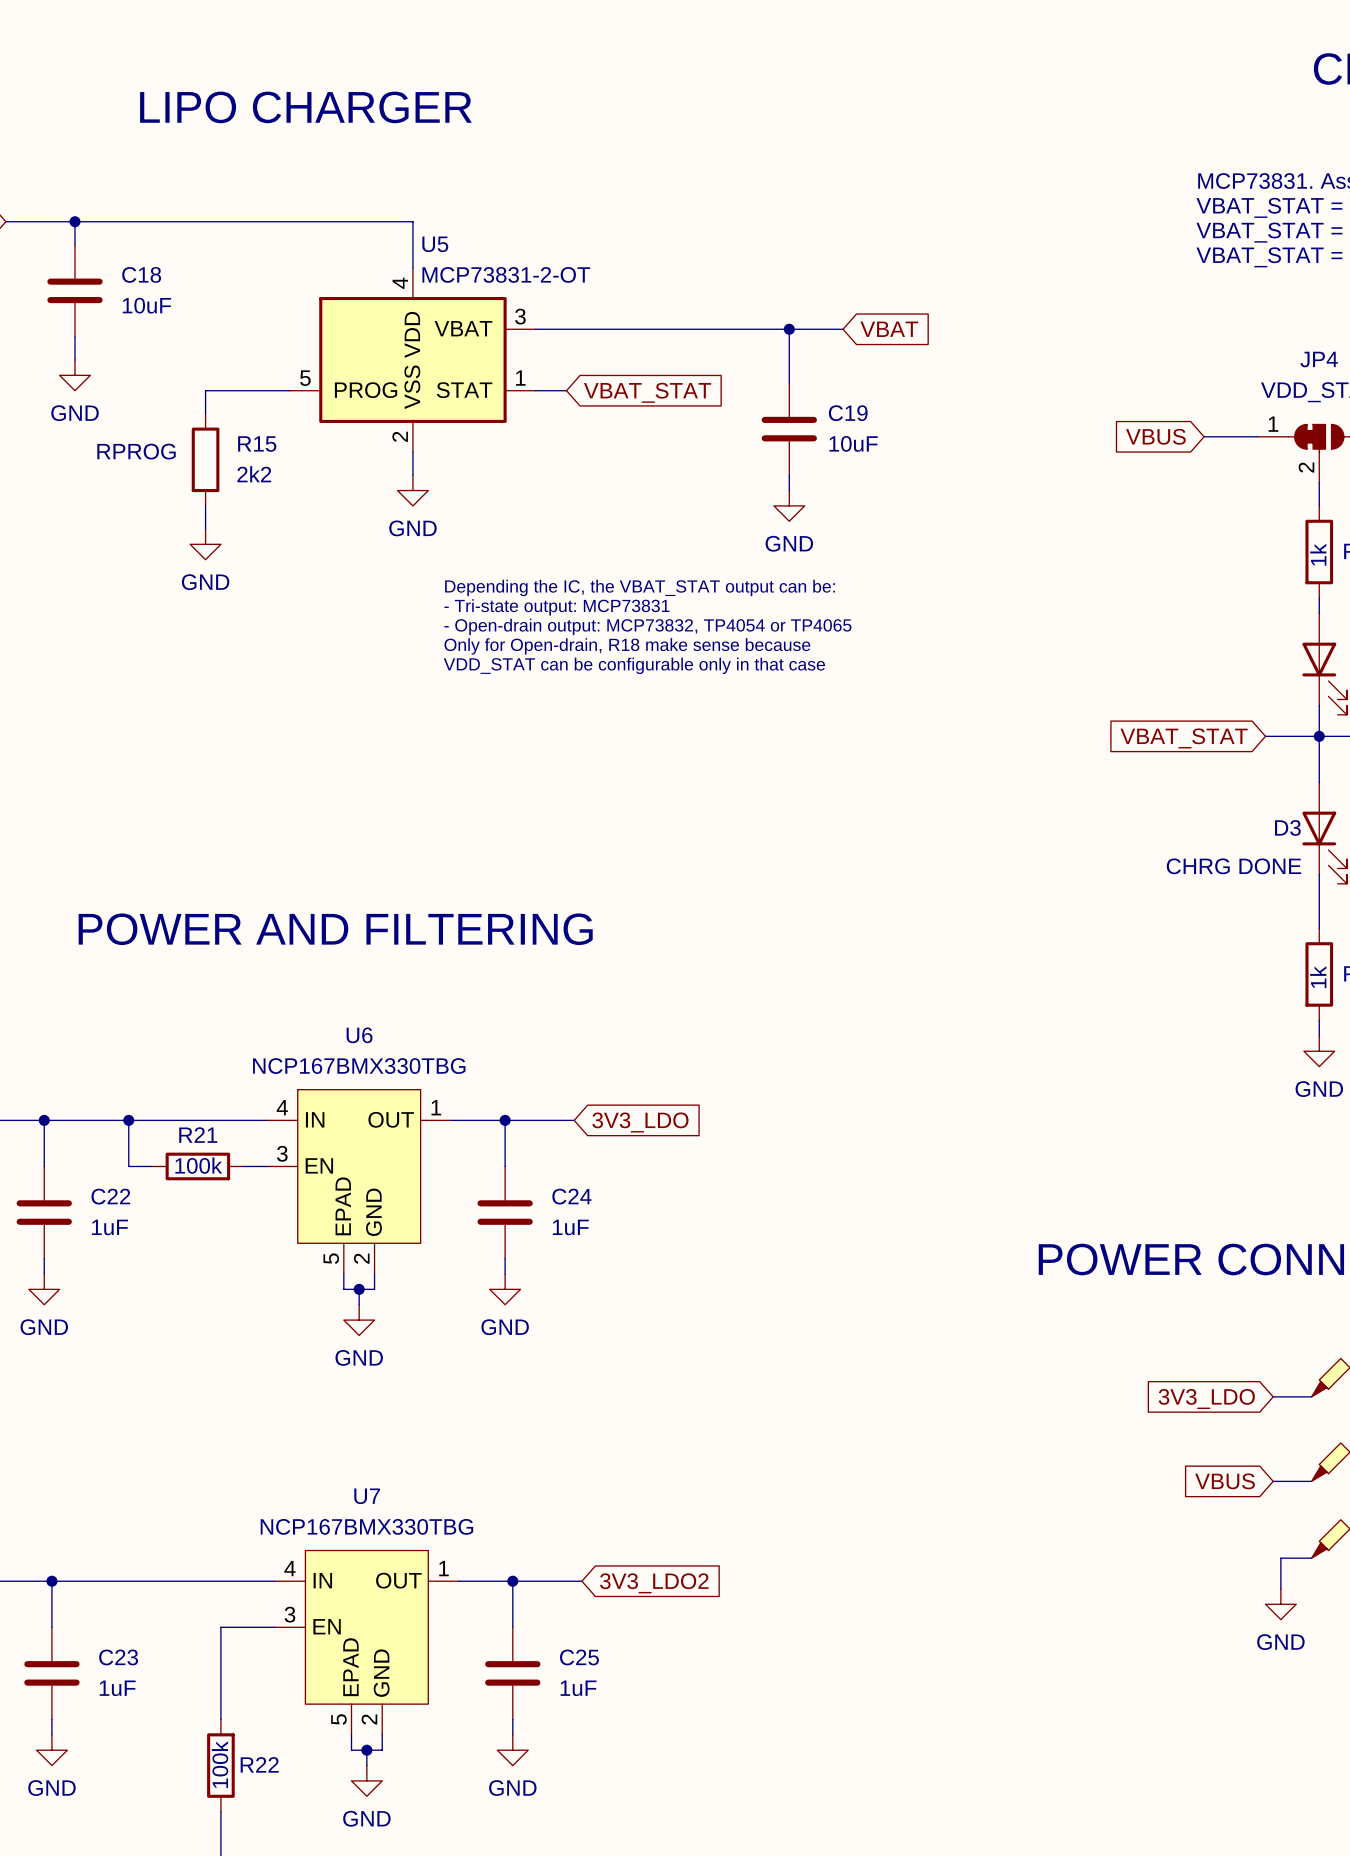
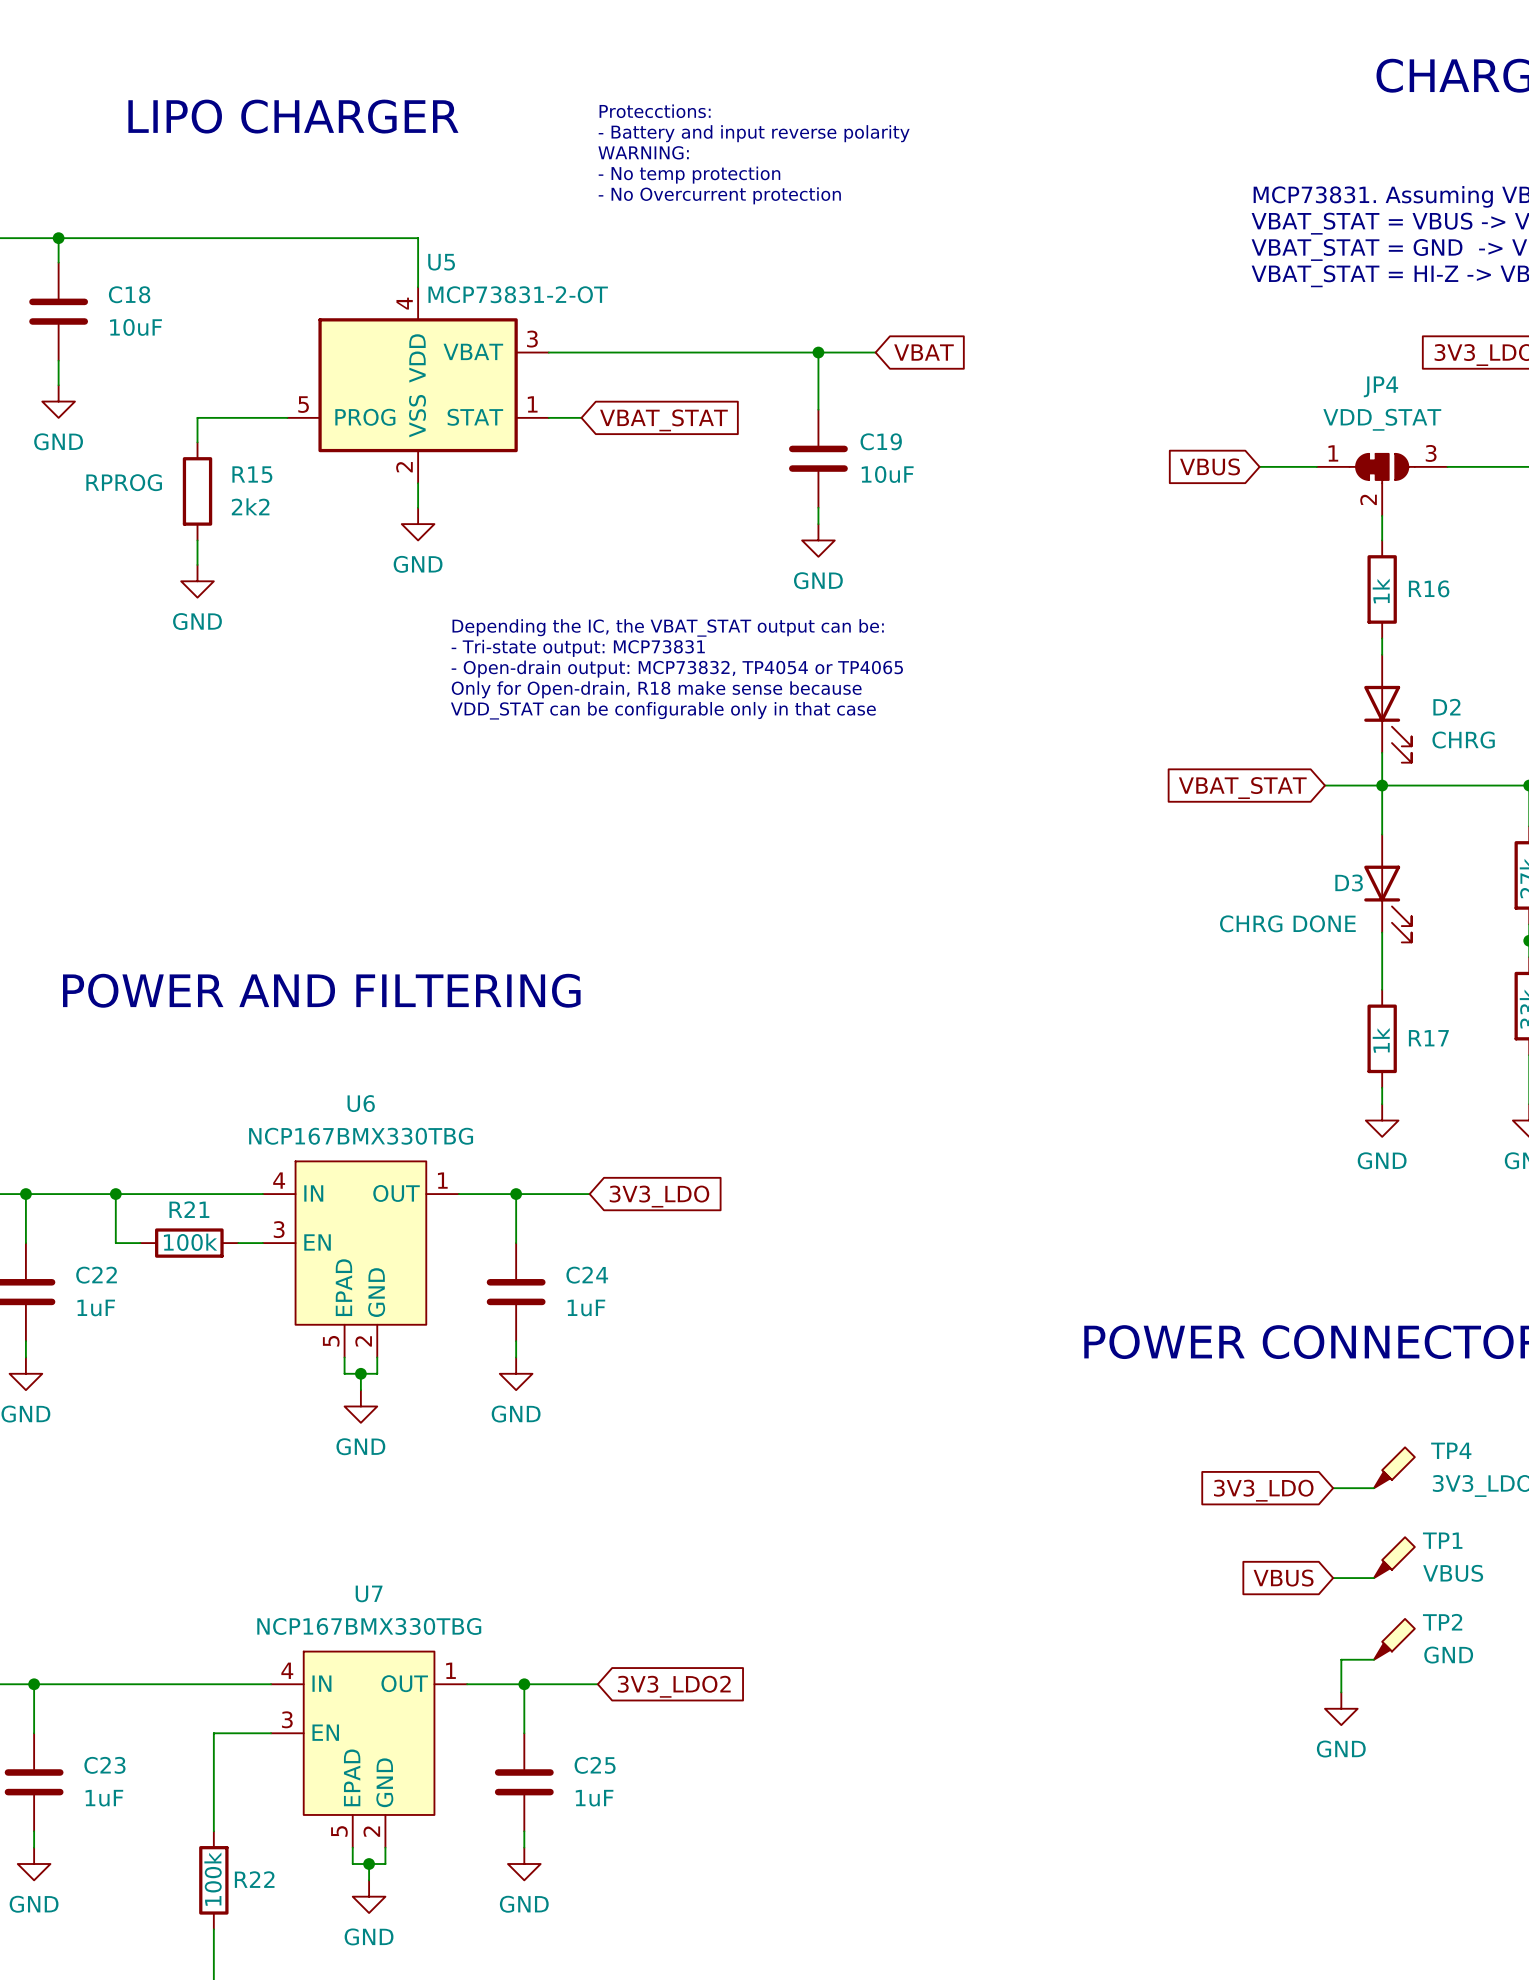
text: none -> Protecctions: (655, 111)
text: none -> - Battery and input reverse polarity (754, 133)
text: none -> WARNING: (643, 152)
text: none -> - No temp protection (689, 175)
text: none -> - No Overcurrent protection (719, 195)

